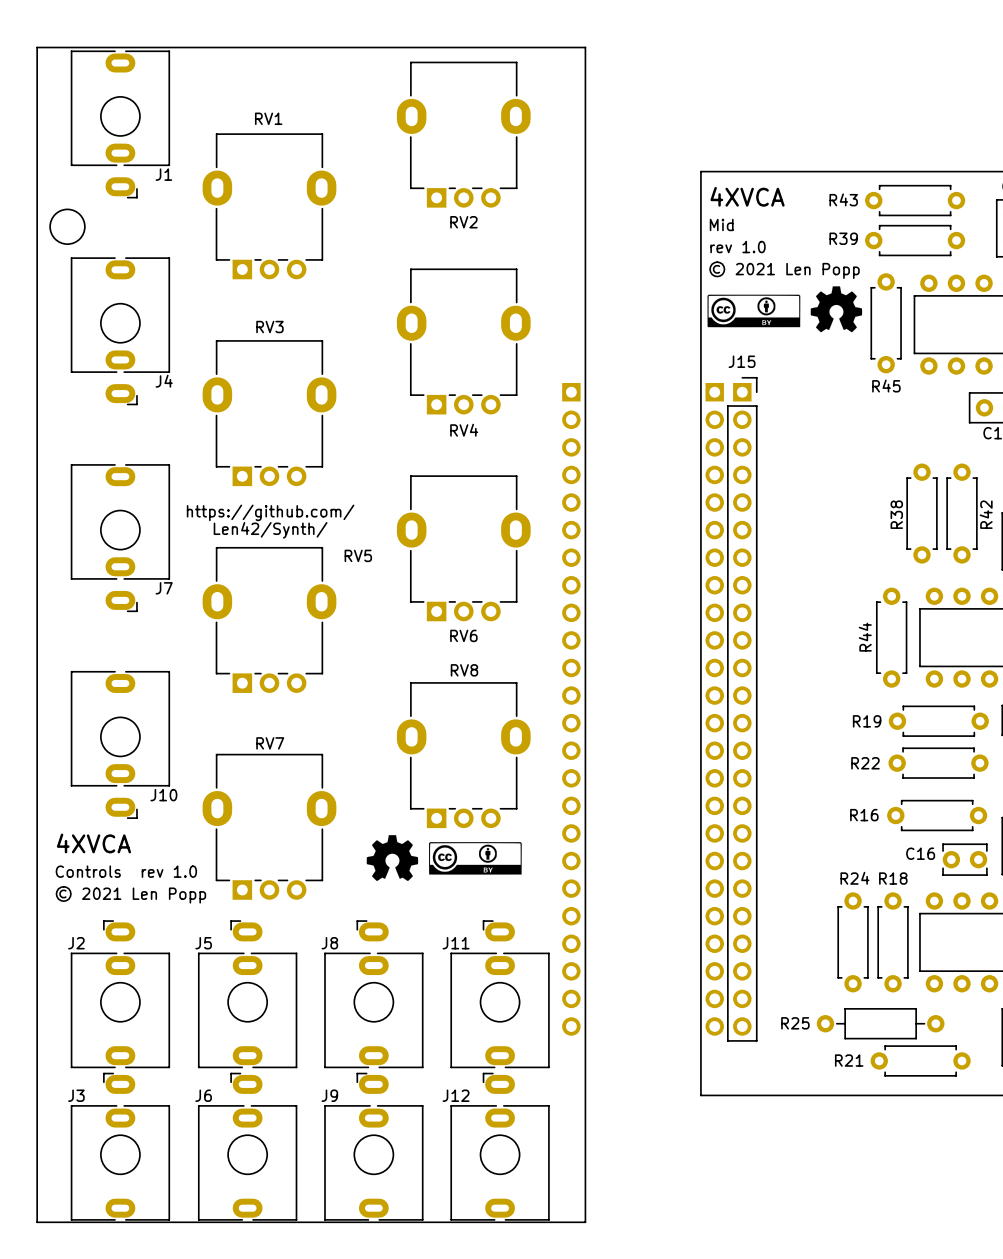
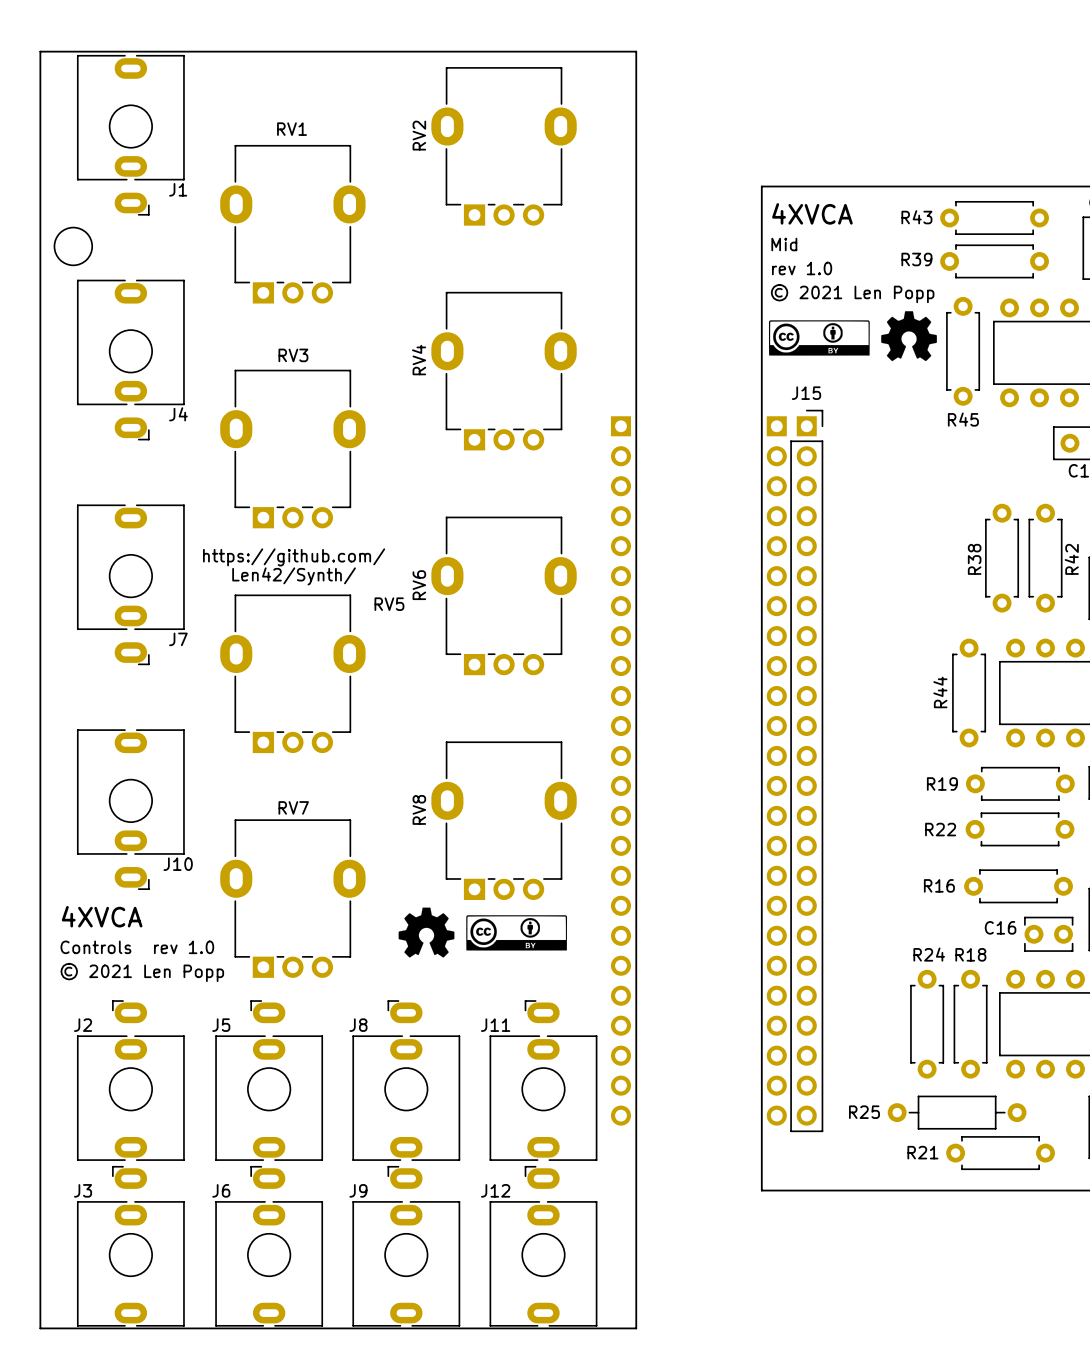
RV2 name rotation: 0° (463, 222) -> 90° counterclockwise (419, 135)
RV2 name position: RV2 (463, 222) -> RV2 (419, 135)
RV4 name rotation: 0° (464, 430) -> 90° counterclockwise (419, 360)
RV4 name position: RV4 (464, 430) -> RV4 (419, 360)
RV6 name rotation: 0° (463, 635) -> 90° counterclockwise (419, 585)
RV6 name position: RV6 (463, 635) -> RV6 (419, 585)
RV8 name rotation: 0° (464, 670) -> 90° counterclockwise (419, 809)
RV8 name position: RV8 (464, 670) -> RV8 (419, 809)

